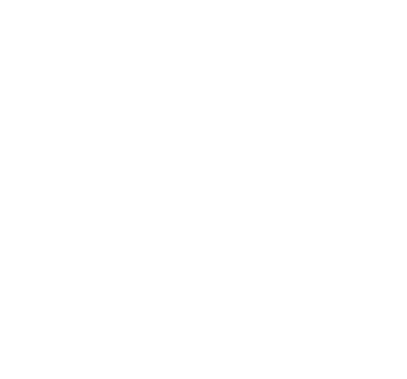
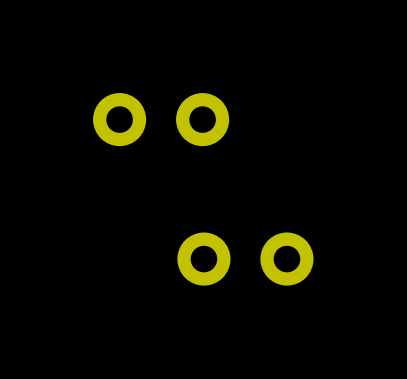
part: none -> (161, 119)
part: none -> (245, 259)

